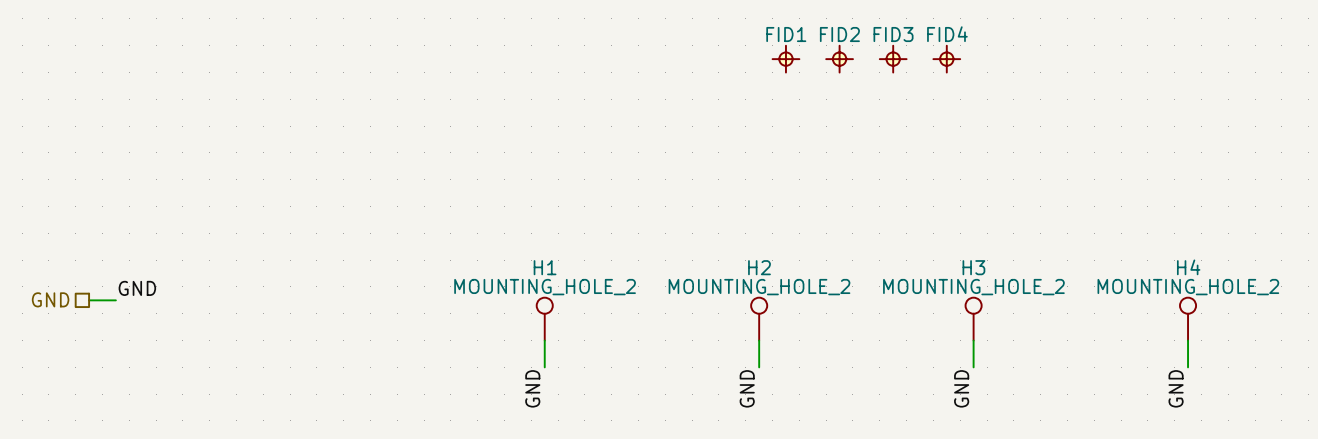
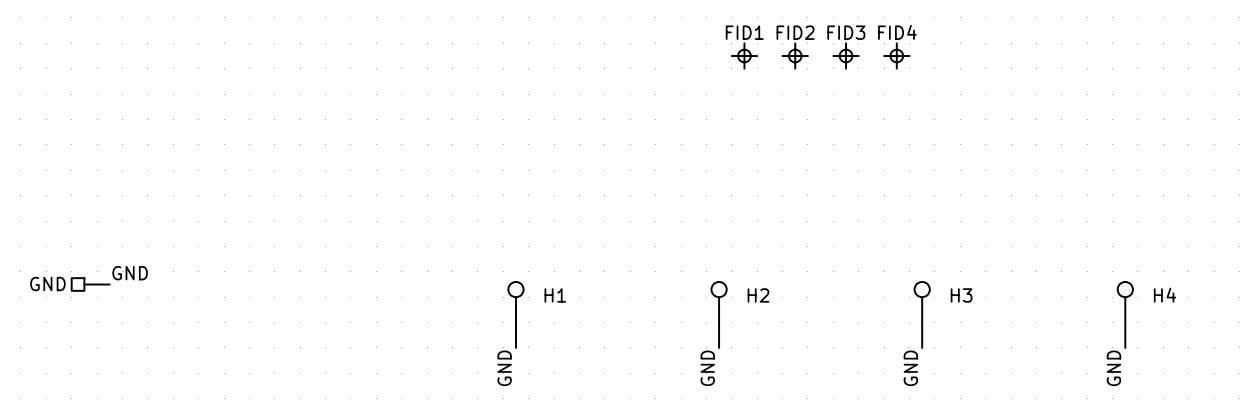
H1 name position: H1 (545, 267) -> H1 (555, 295)
H2 name position: H2 (759, 267) -> H2 (758, 295)
H3 name position: H3 (973, 267) -> H3 (961, 295)
H4 name position: H4 (1188, 267) -> H4 (1164, 295)
H1 value: MOUNTING_HOLE_2 (545, 287) -> none
H2 value: MOUNTING_HOLE_2 (759, 287) -> none
H3 value: MOUNTING_HOLE_2 (973, 287) -> none
H4 value: MOUNTING_HOLE_2 (1188, 287) -> none

